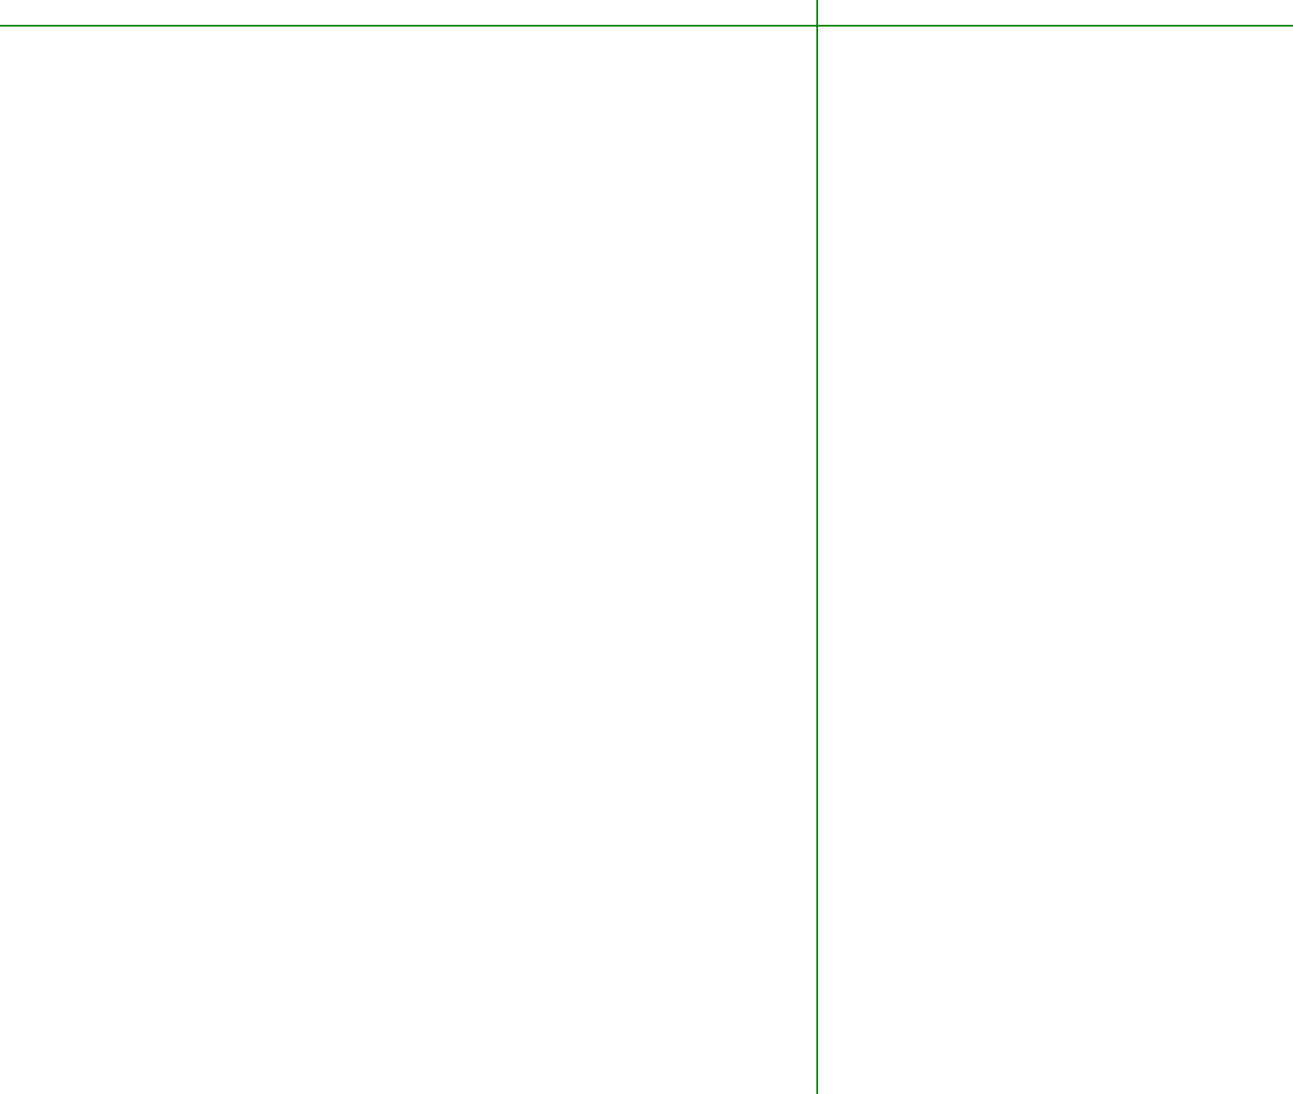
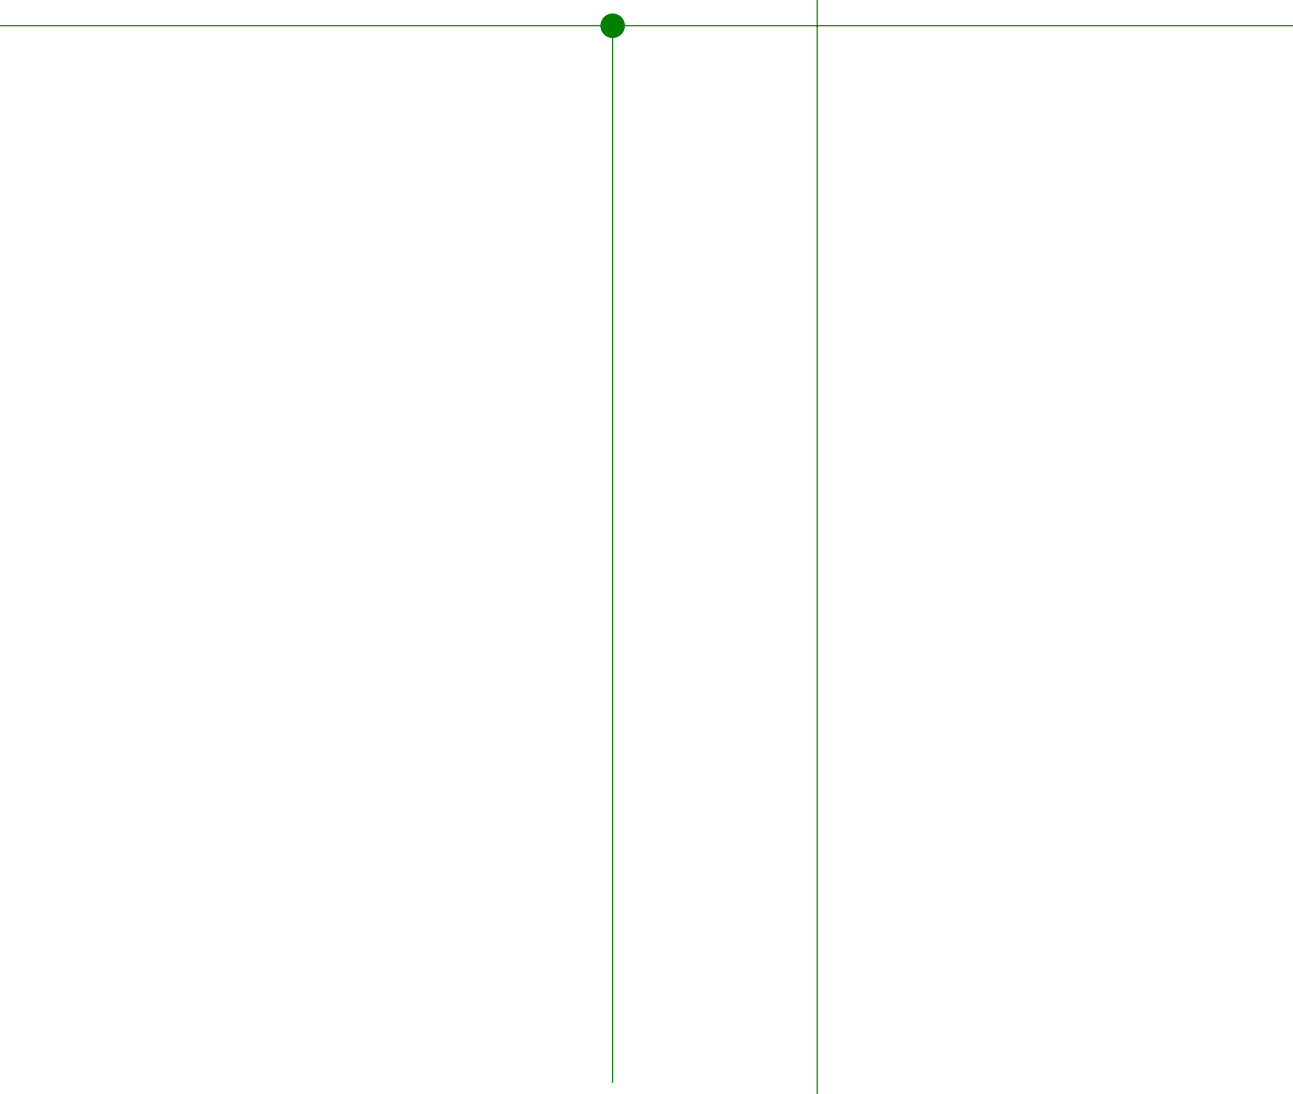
wire: none -> (612, 25) (612, 1082)
junction: none -> (612, 25)

